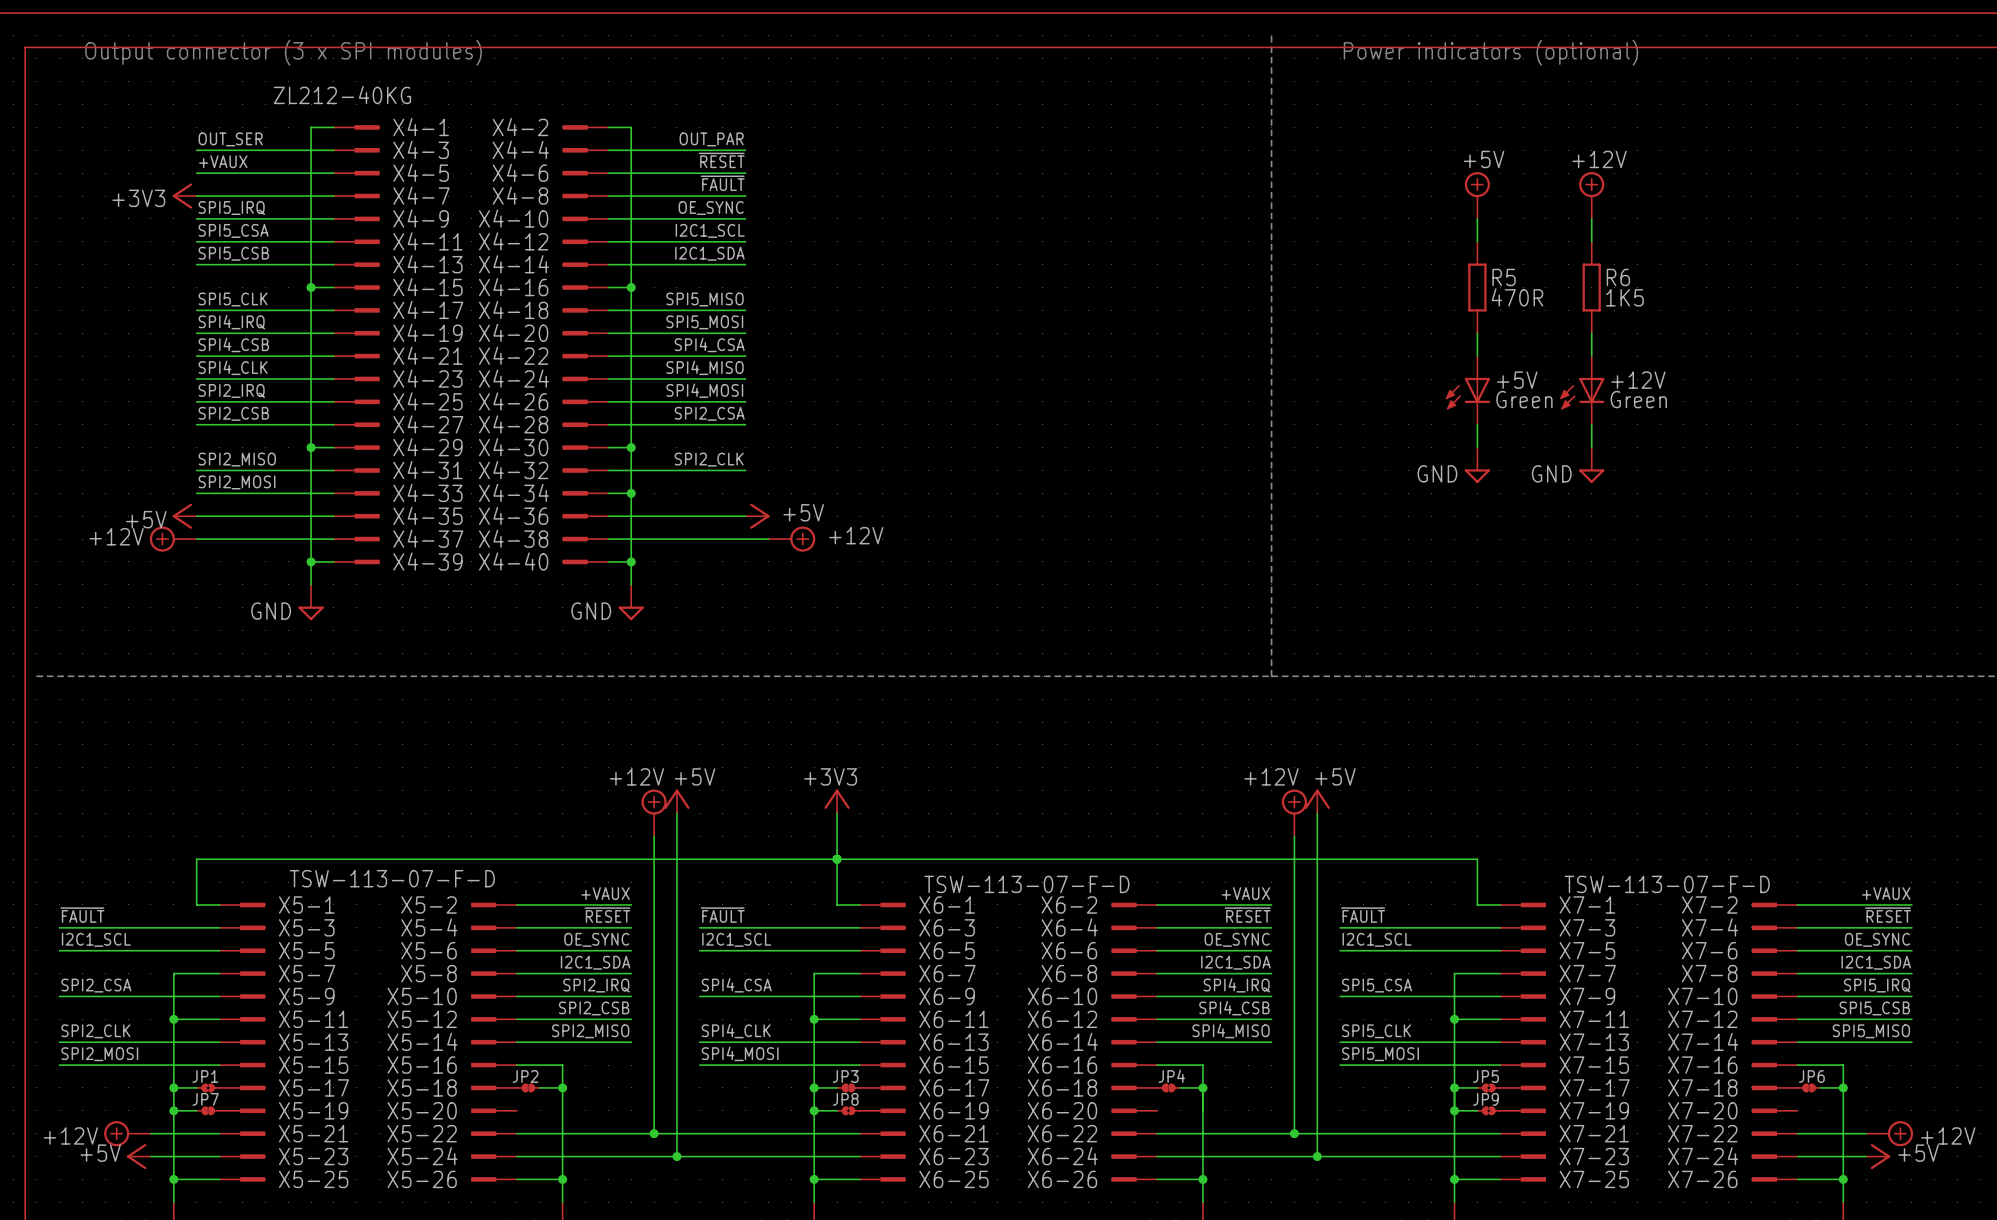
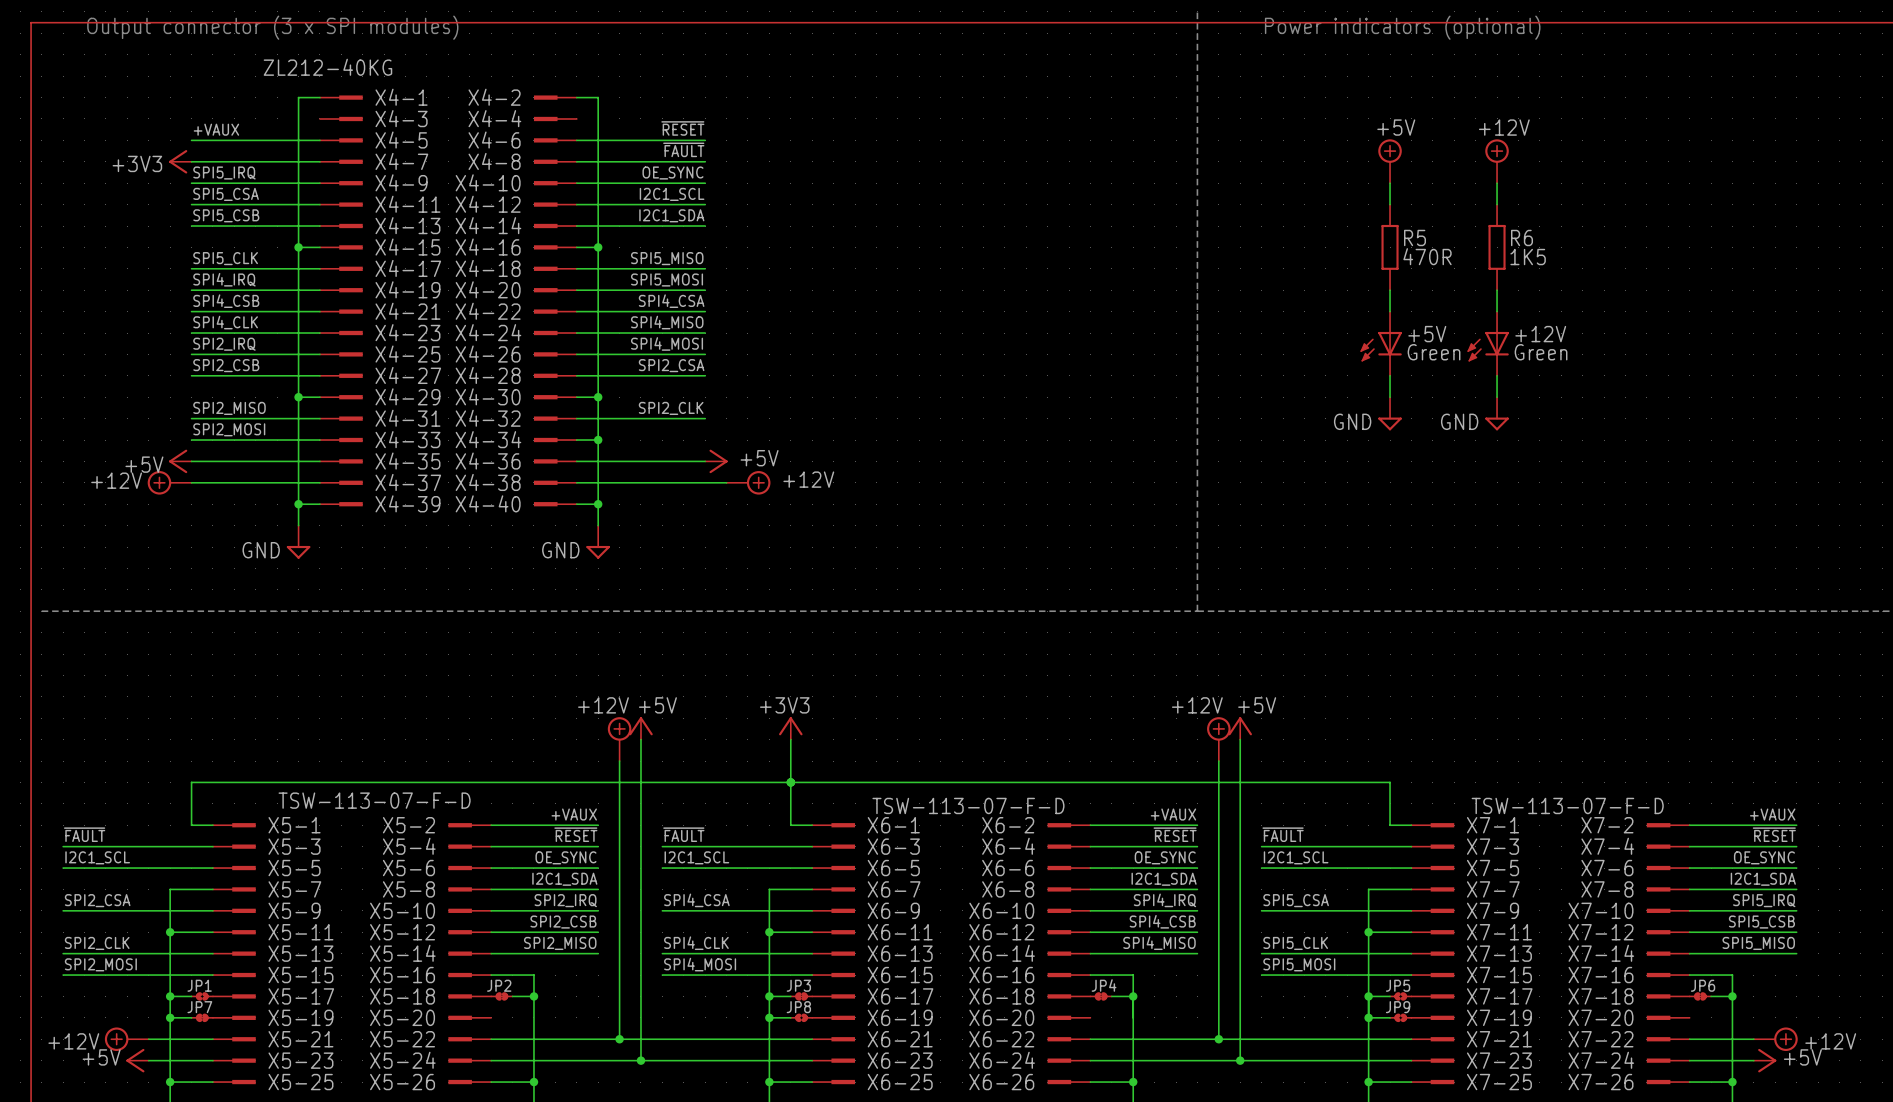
label: OUT_SER (230, 139) -> none
label: OUT_PAR (711, 139) -> none
wire: (196, 150) (333, 150) -> none
wire: (608, 150) (745, 150) -> none

